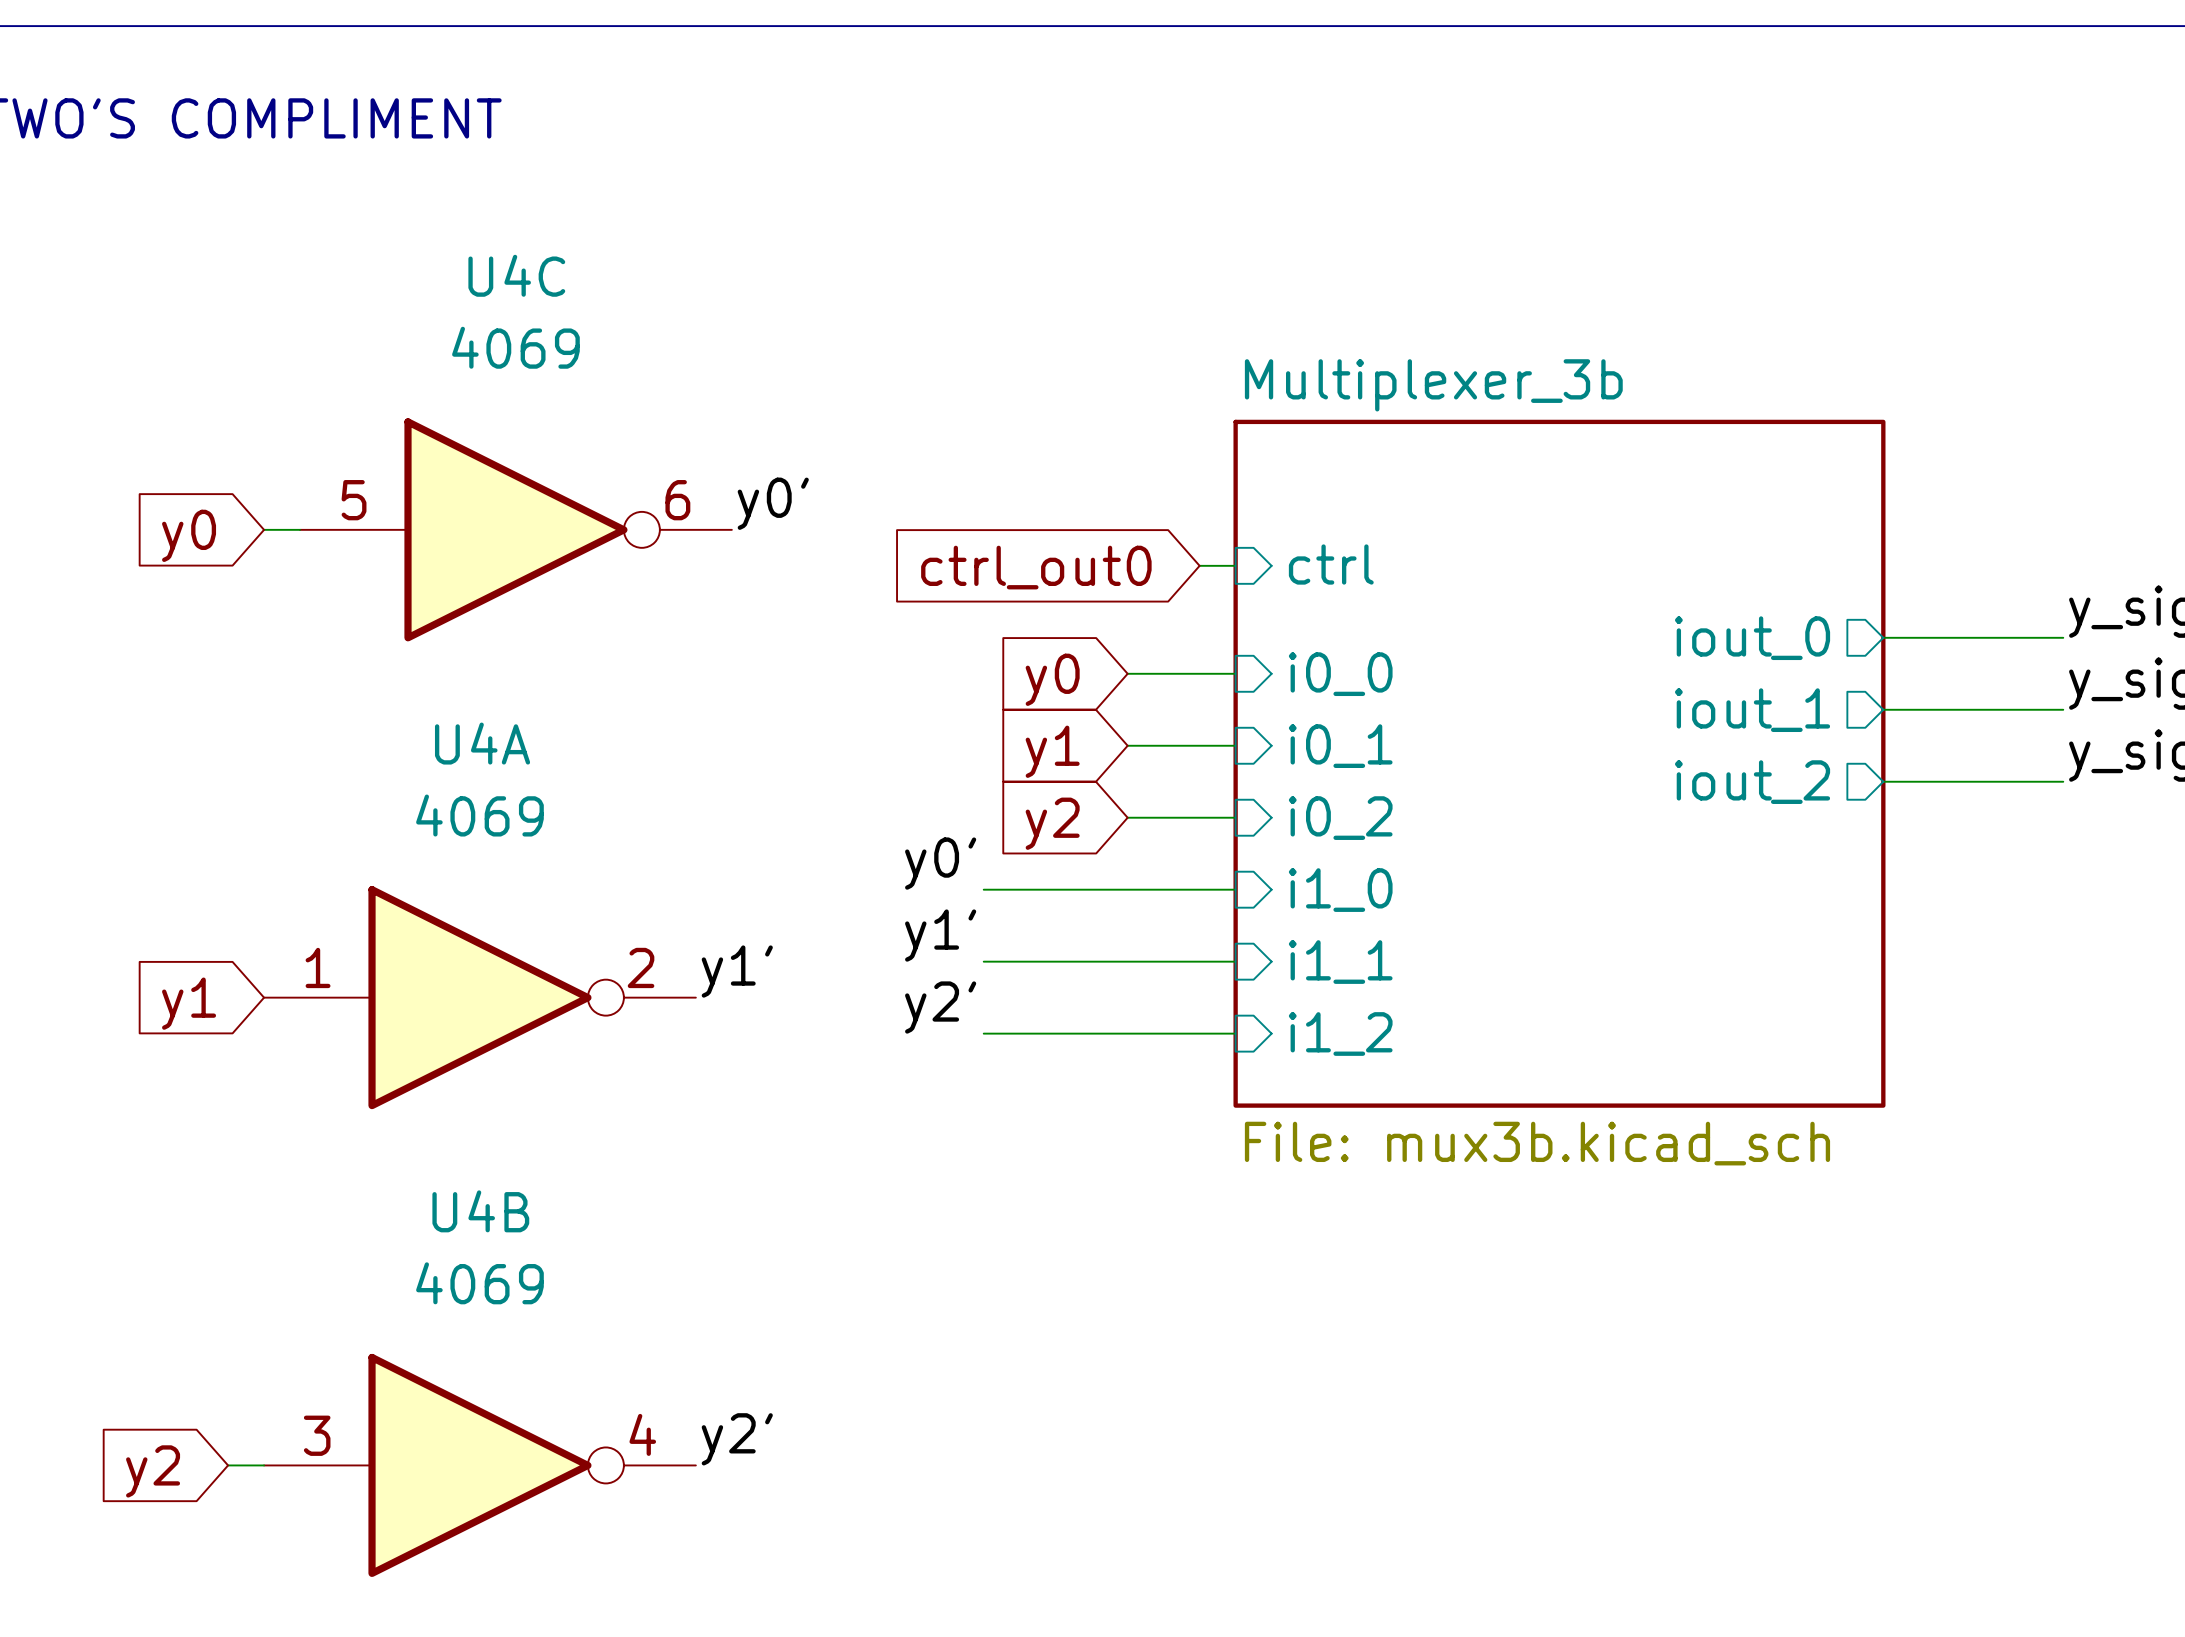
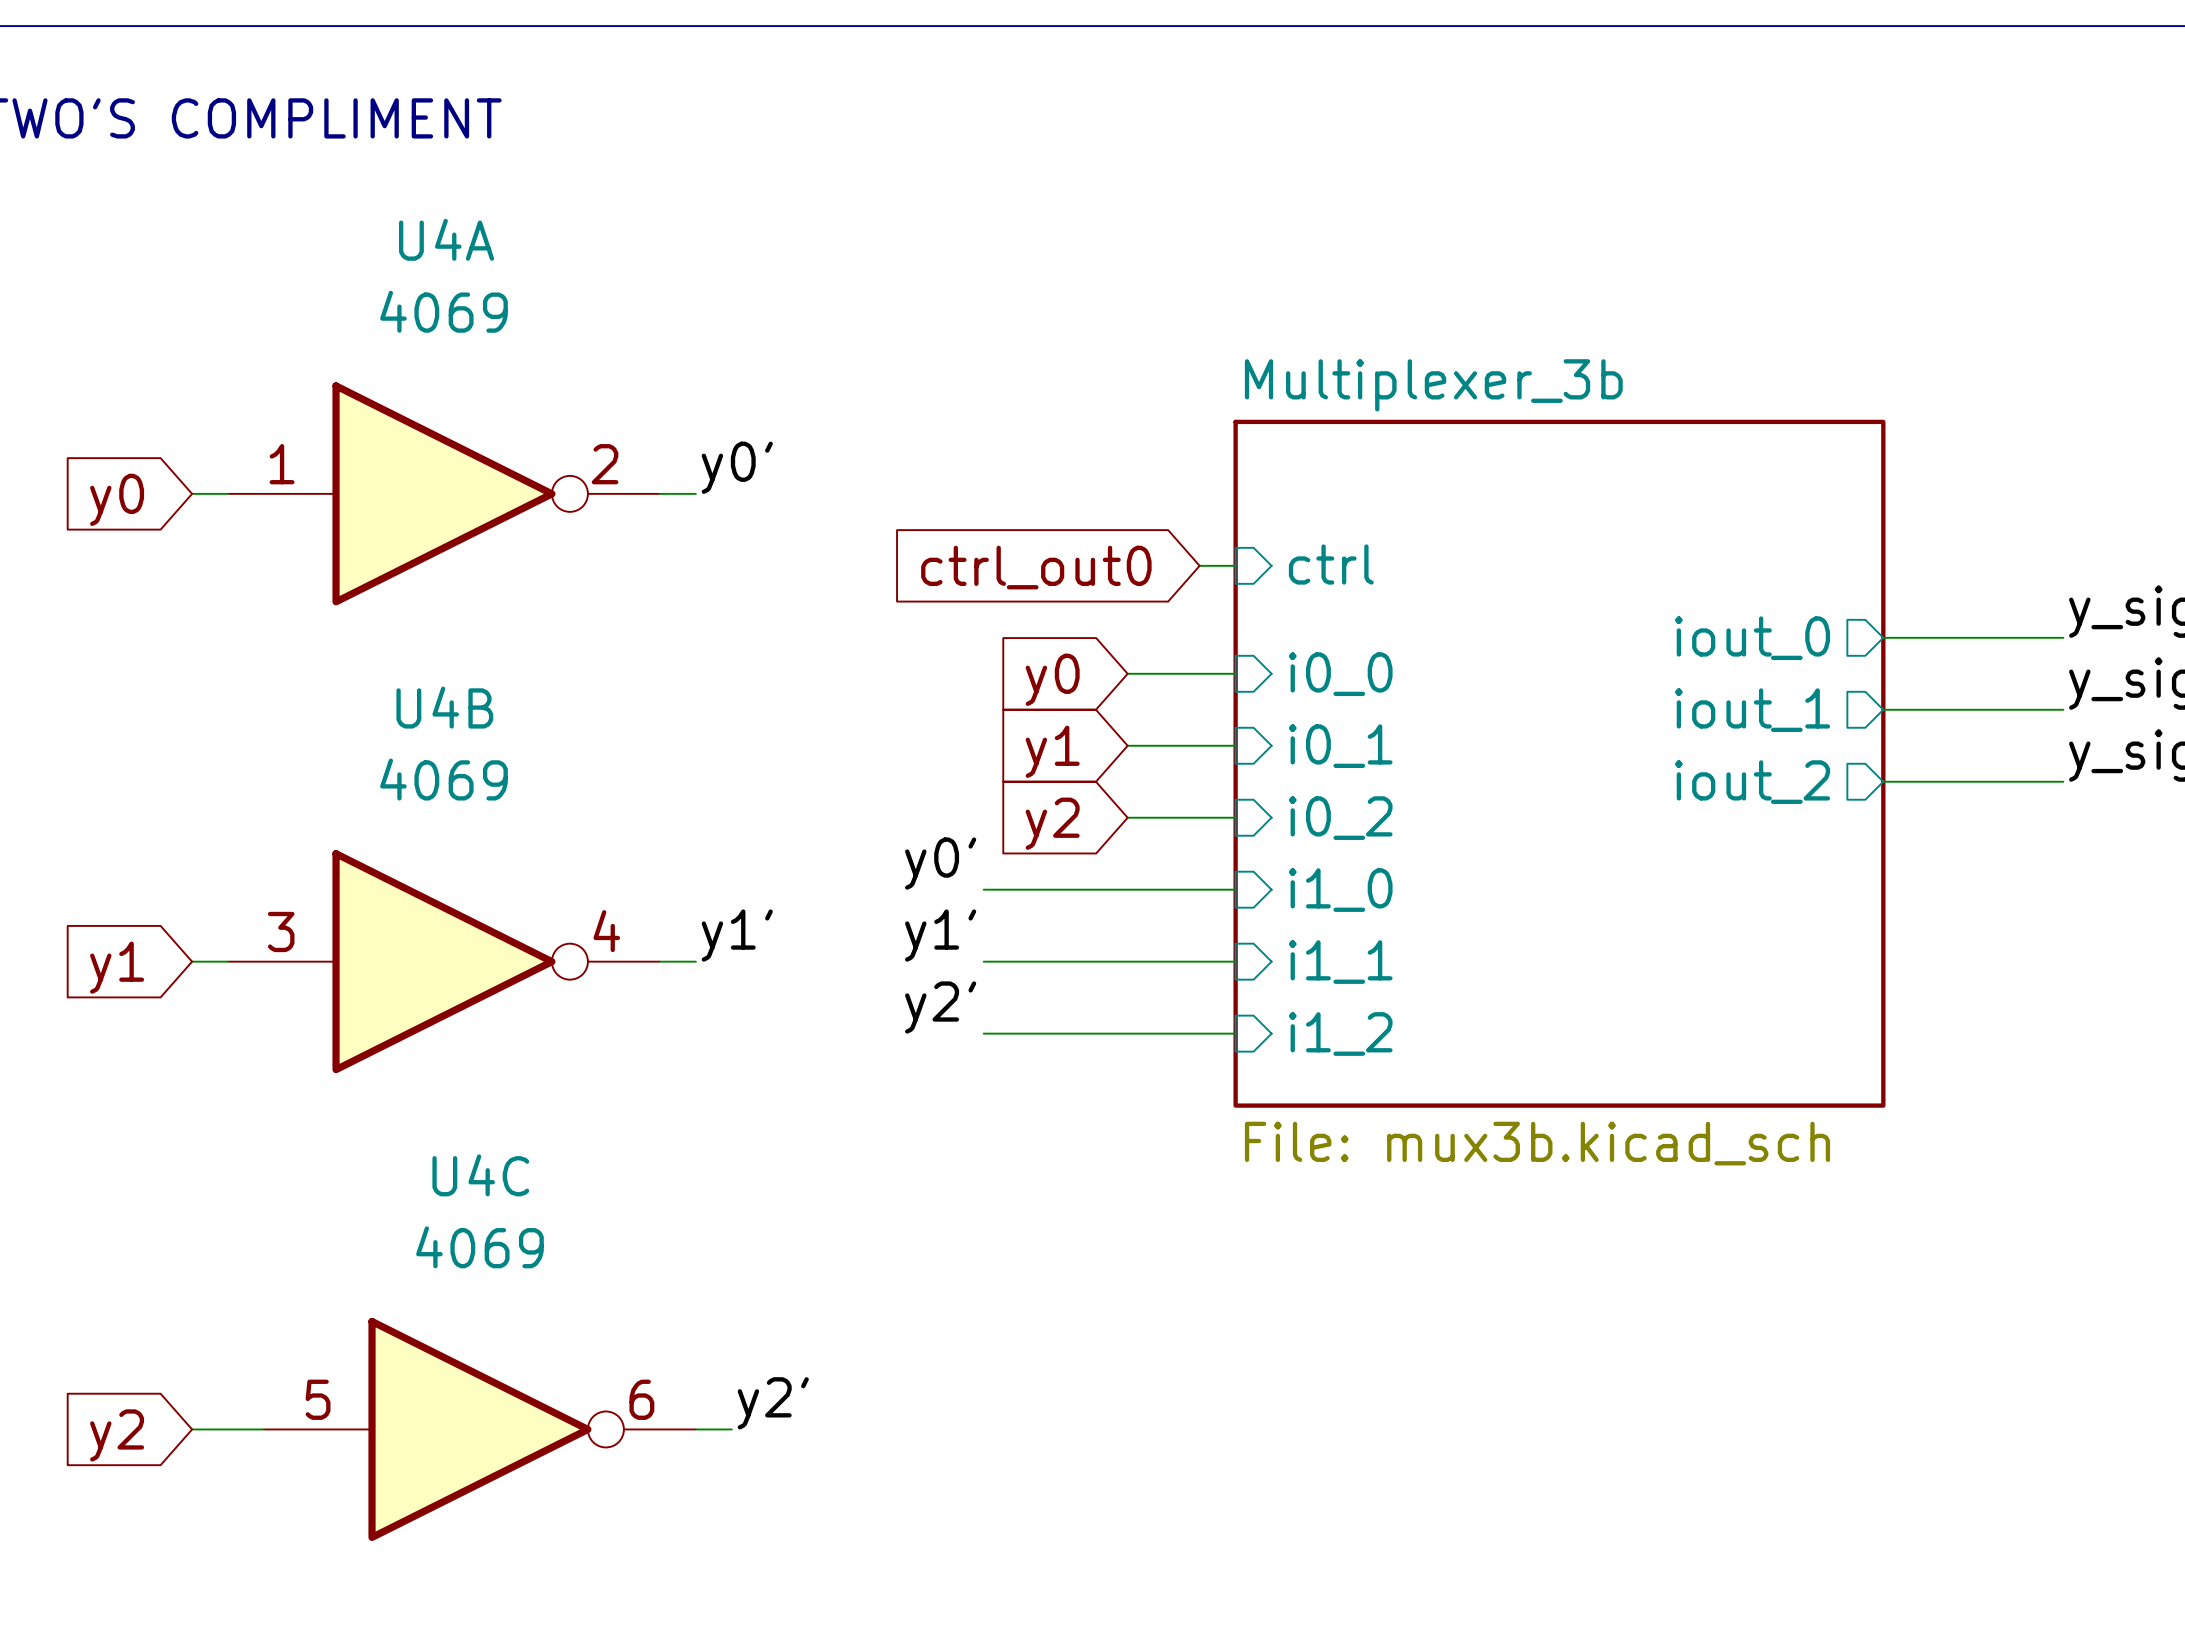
wire: none -> (659, 493) (695, 493)
label position: y0' (773, 503) -> y0' (737, 467)
wire: (264, 529) (300, 529) -> (192, 493) (228, 493)
U4C position: (515, 529) -> (479, 1429)
global label position: y0 (189, 535) -> y0 (117, 499)
wire: none -> (192, 961) (228, 961)
wire: none -> (659, 961) (695, 961)
label position: y1' (737, 971) -> y1' (737, 935)
U4A position: (479, 997) -> (443, 493)
global label position: y1 (189, 1003) -> y1 (117, 967)
wire: none -> (192, 1429) (264, 1429)
label position: y2' (737, 1439) -> y2' (773, 1403)
wire: (228, 1465) (264, 1465) -> (695, 1429) (731, 1429)
U4B position: (479, 1465) -> (443, 961)
global label position: y2 (153, 1471) -> y2 (117, 1435)

